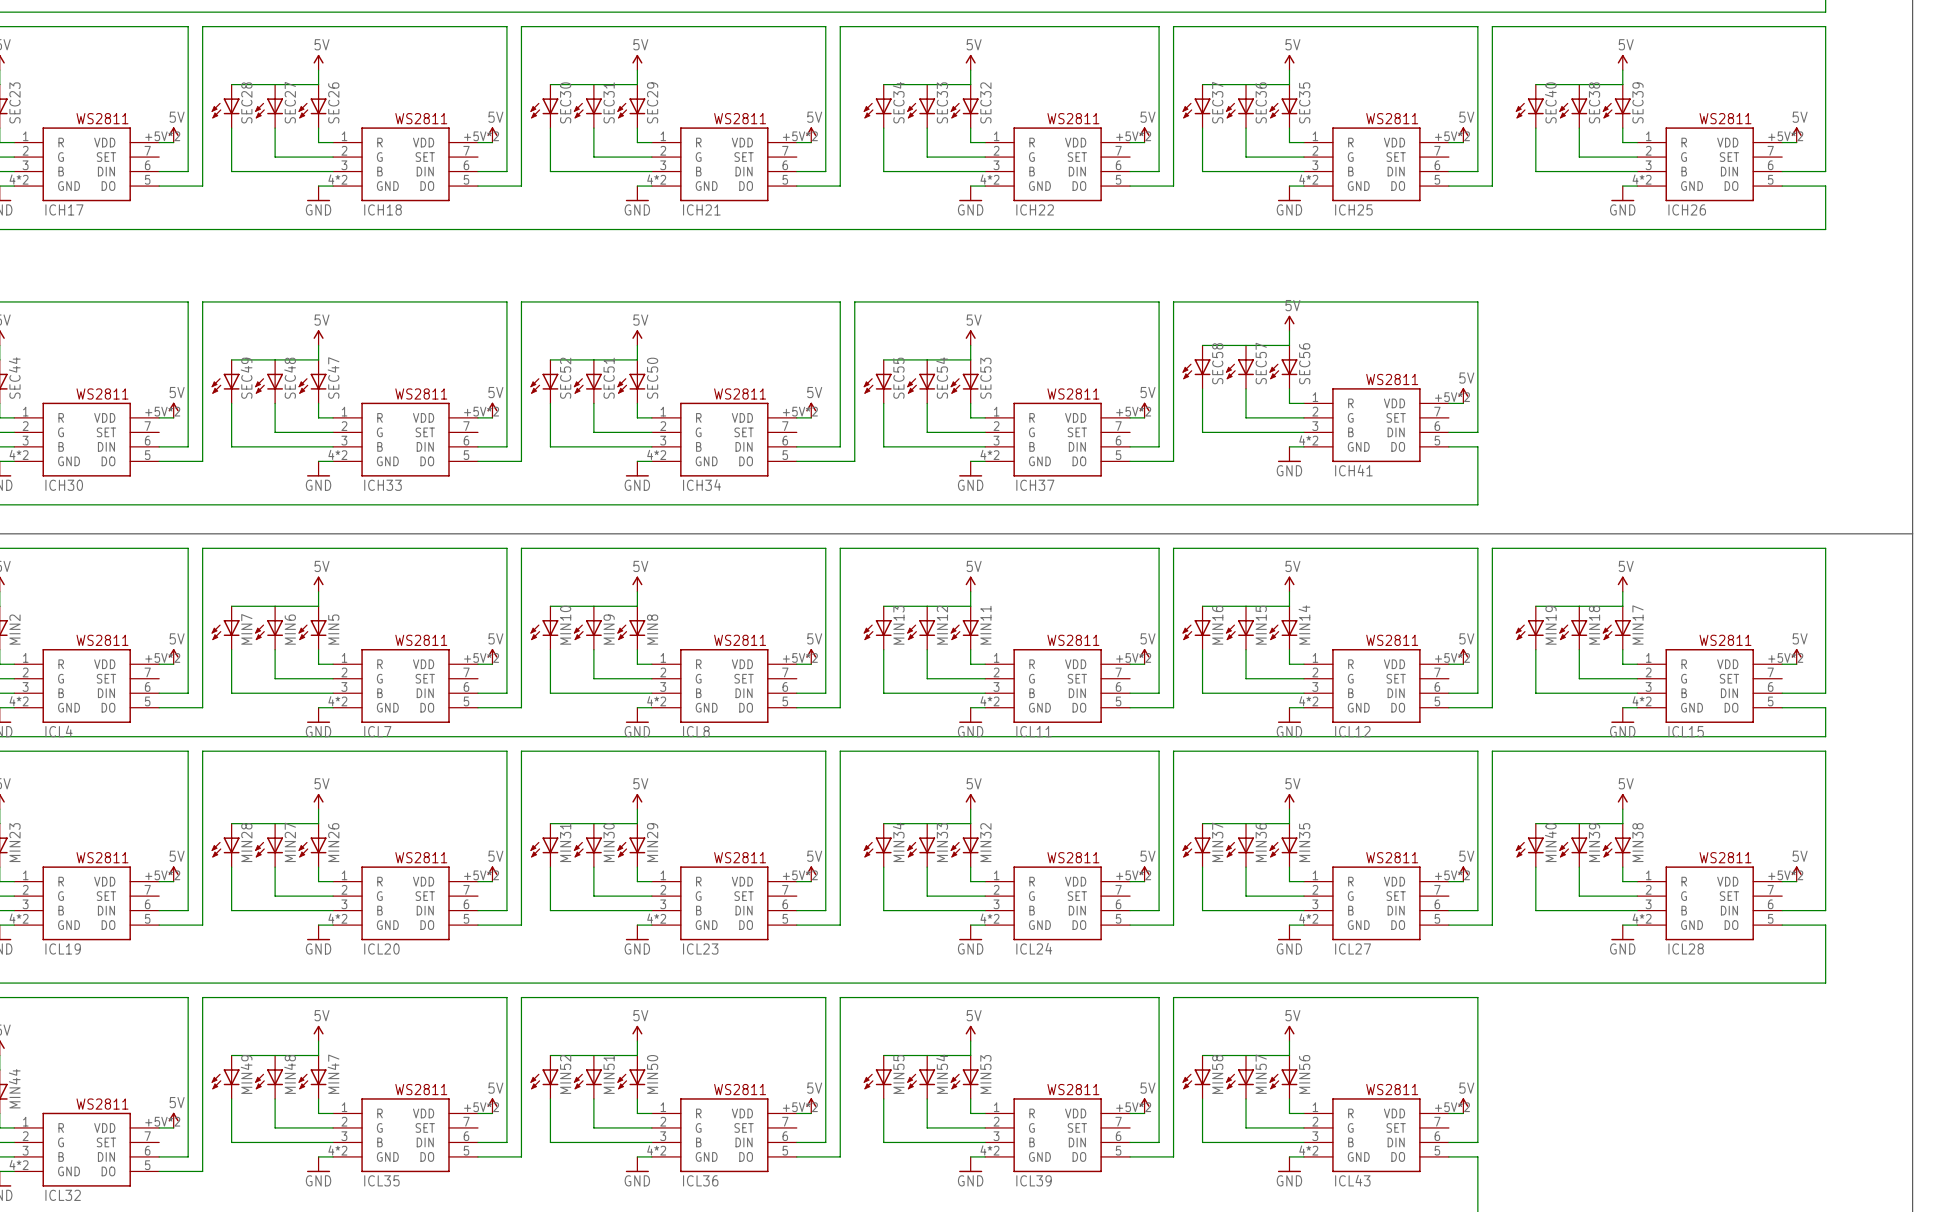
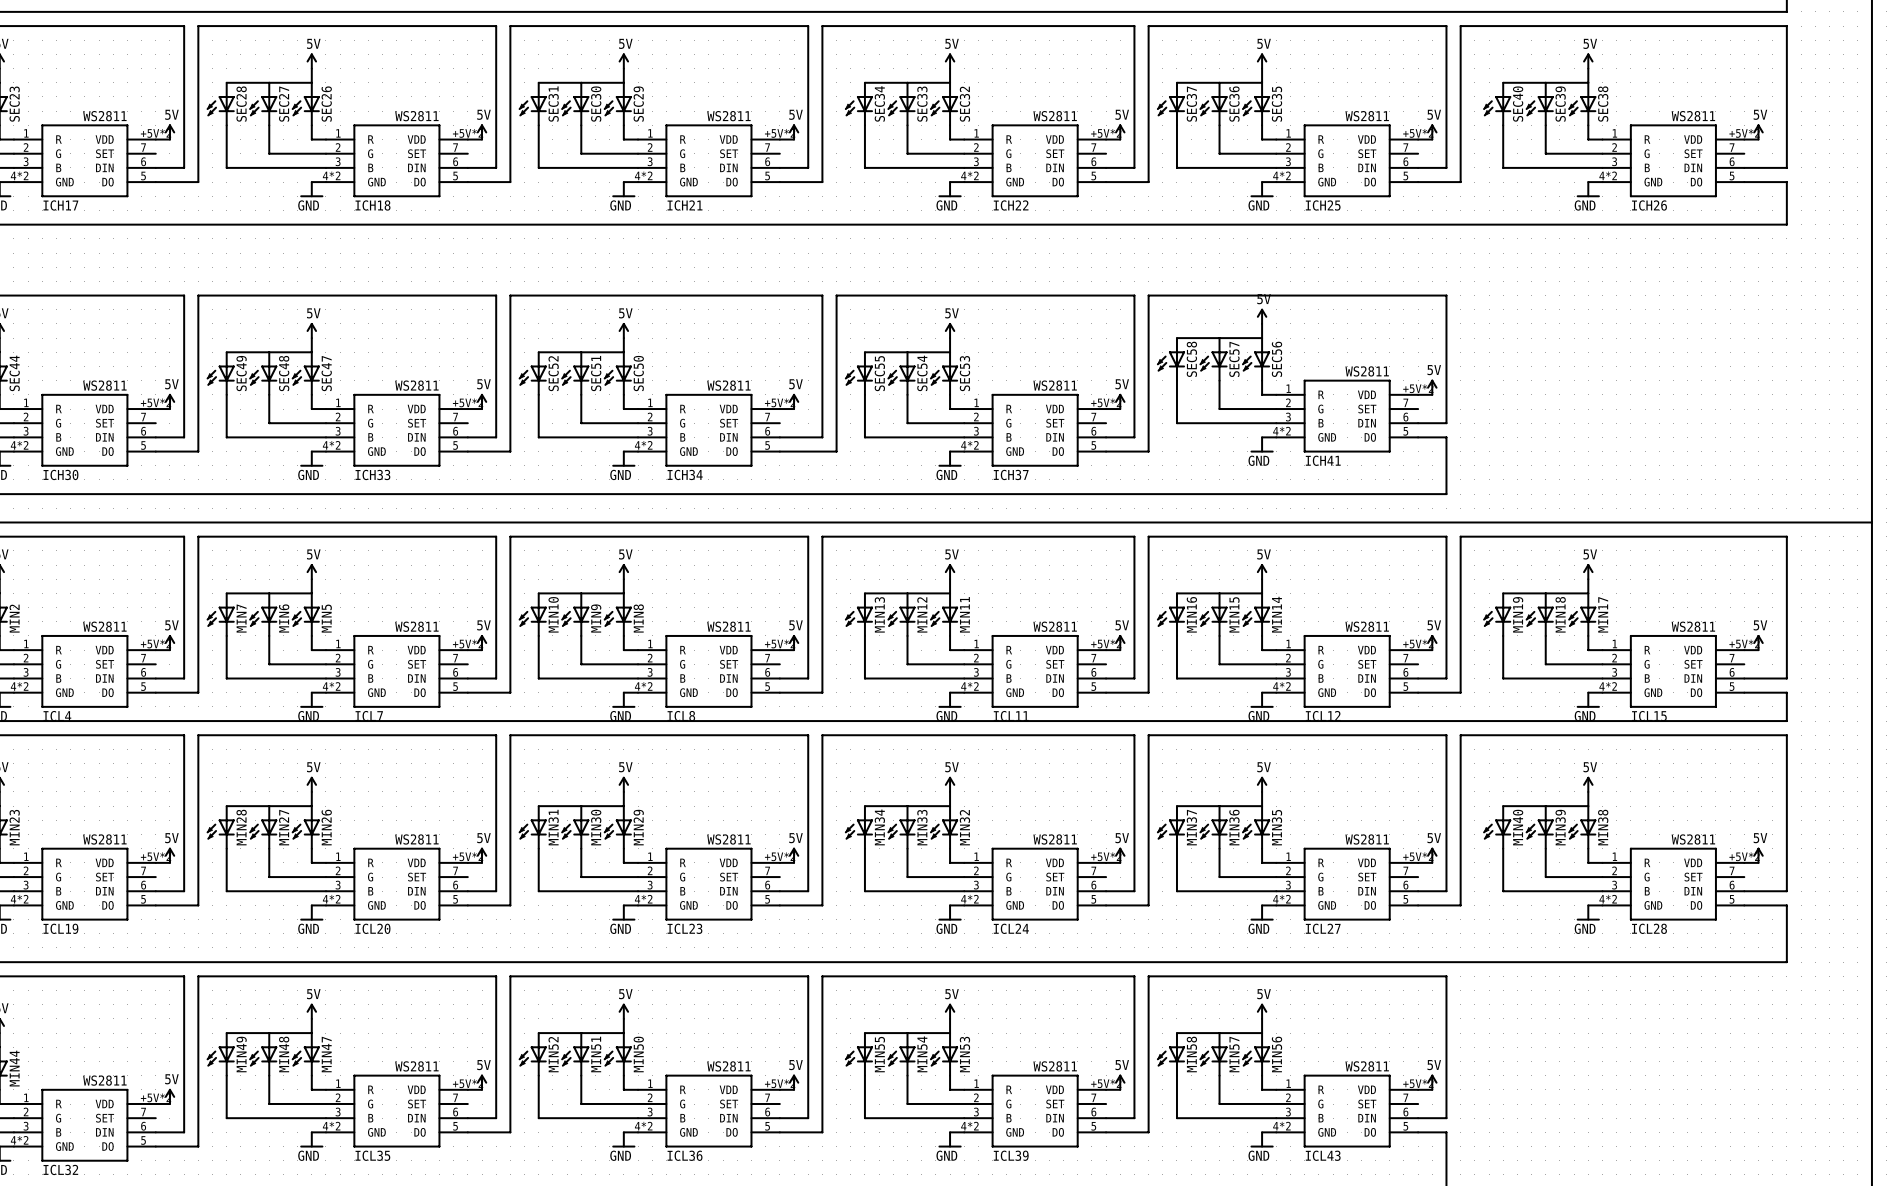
SEC30 name: SEC30 (565, 102) -> SEC31 (553, 104)
SEC31 name: SEC31 (609, 102) -> SEC30 (596, 104)
SEC38 name: SEC38 (1594, 102) -> SEC39 (1560, 104)
SEC39 name: SEC39 (1637, 102) -> SEC38 (1603, 104)

